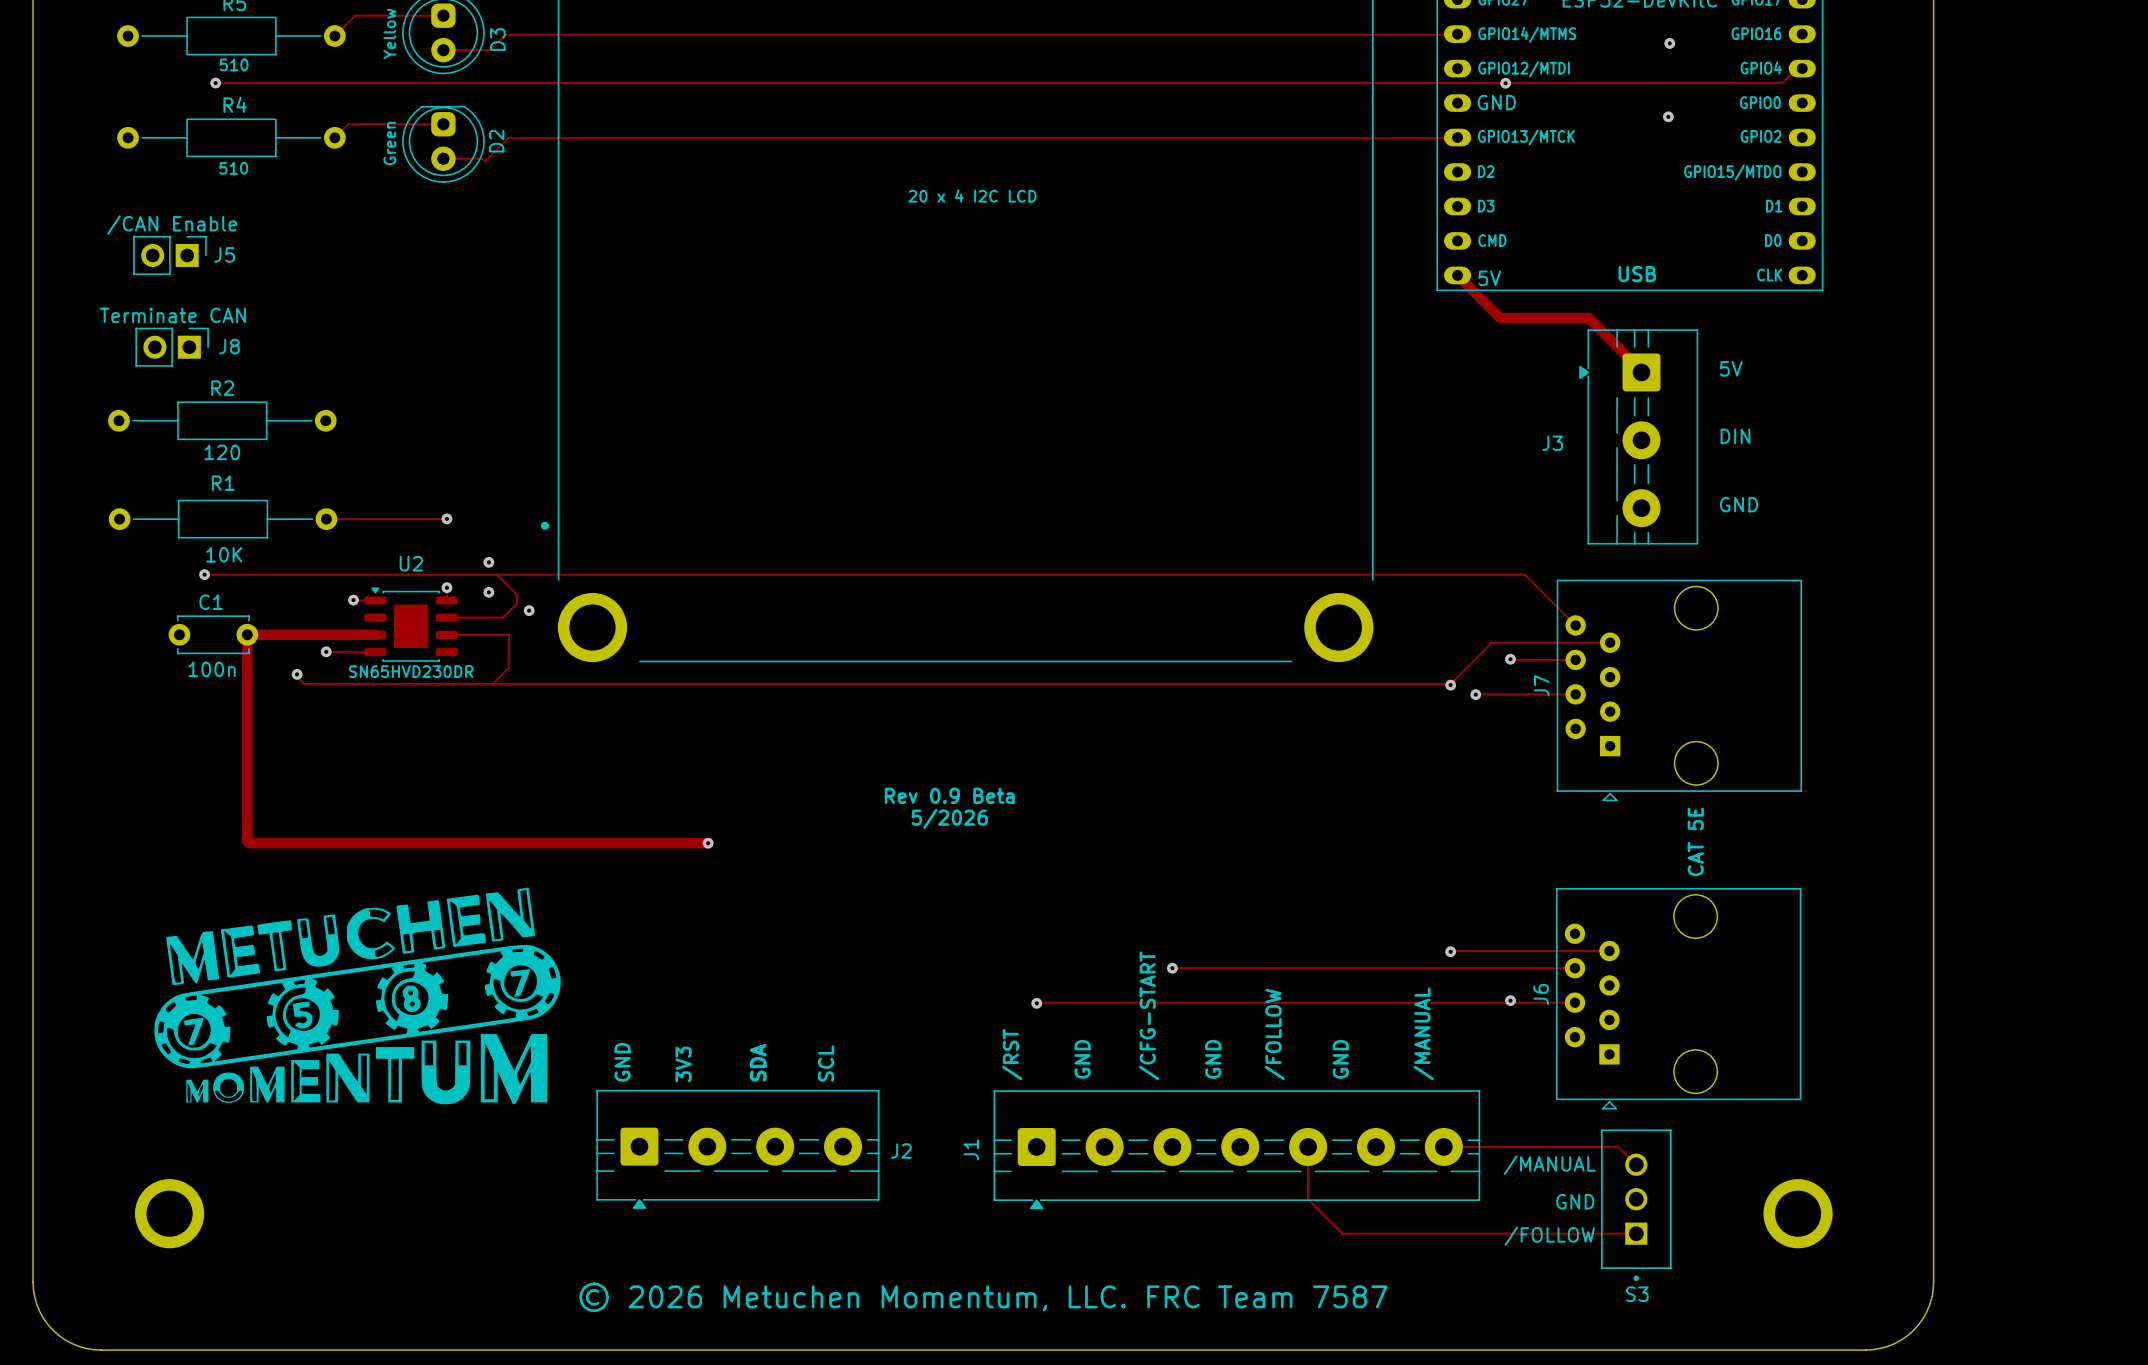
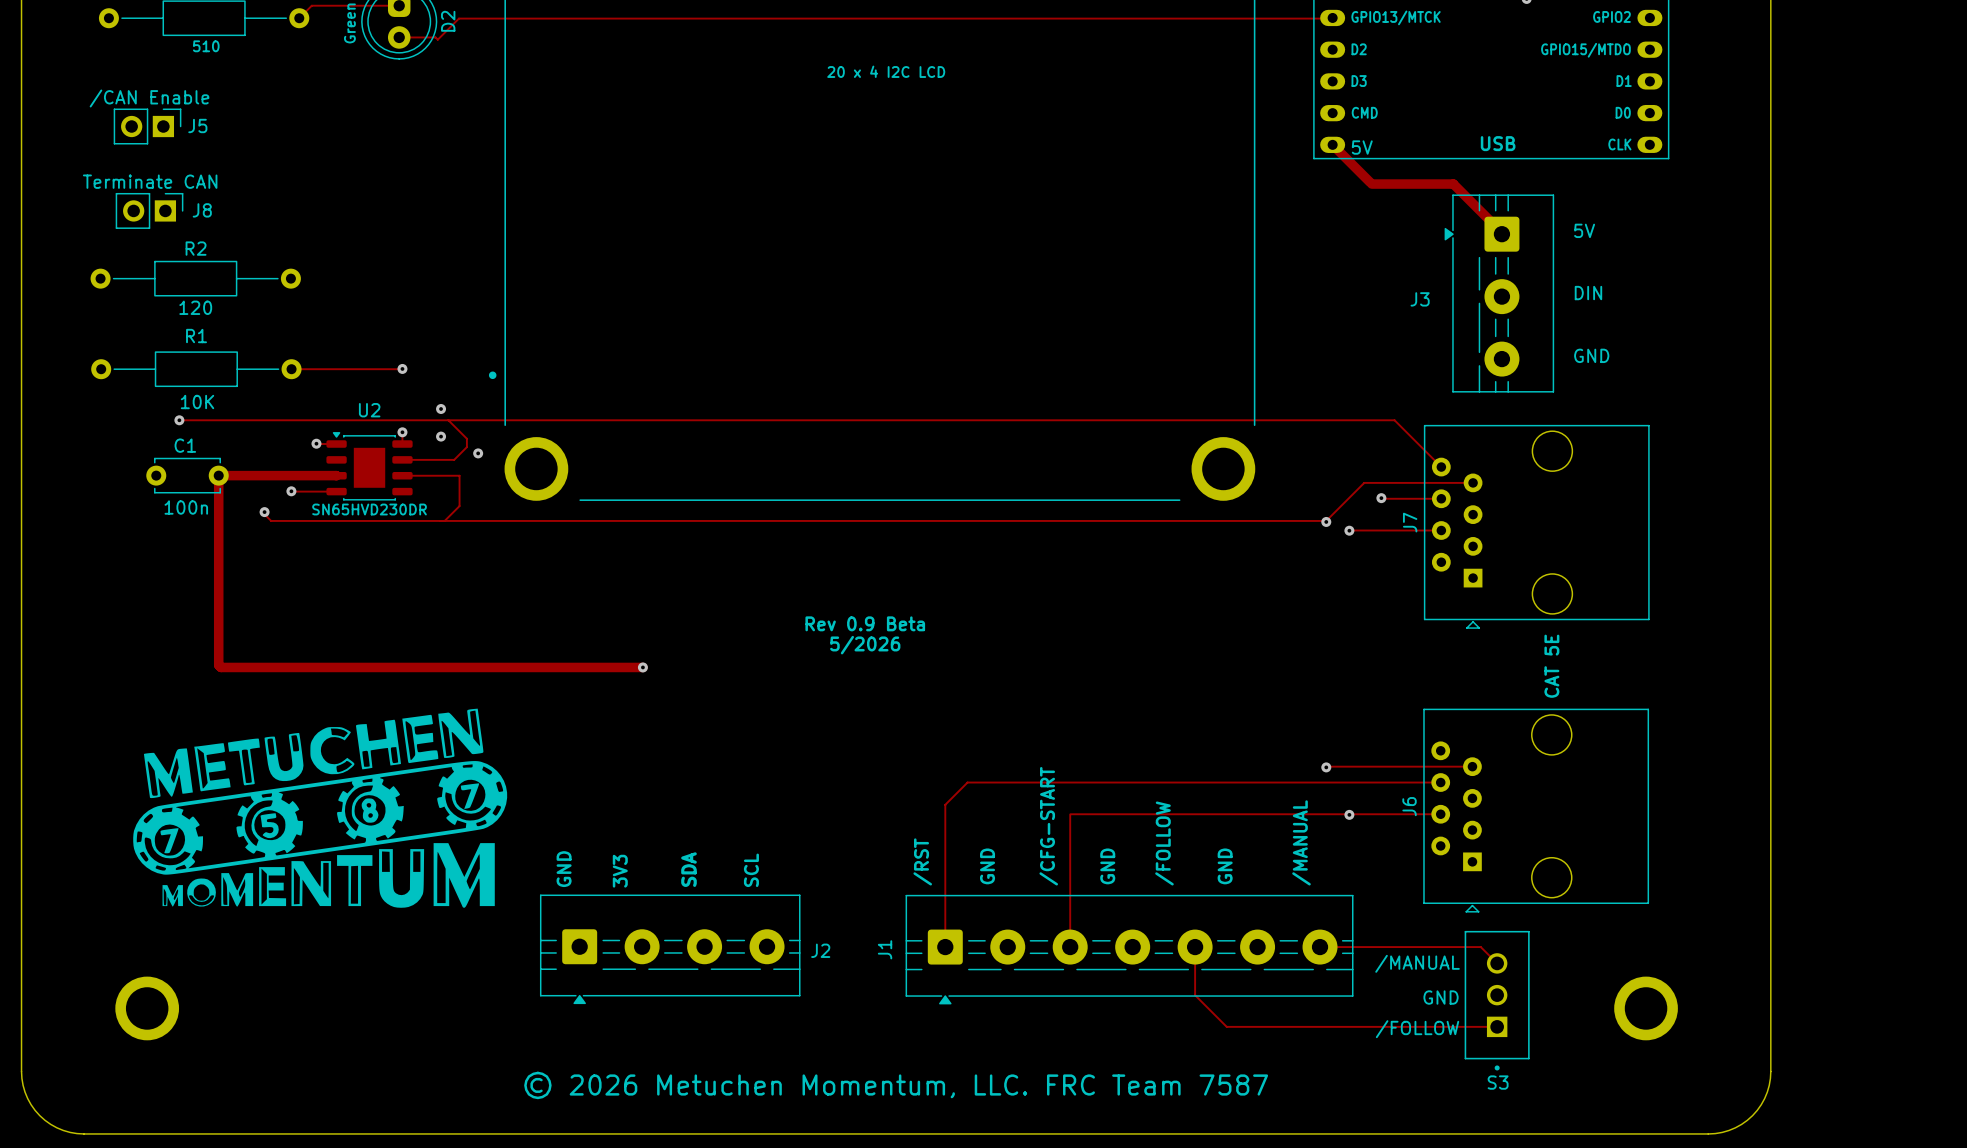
track: none -> (1069, 782) (967, 782) (945, 804)
via: (1172, 968) -> none
track: none -> (945, 805) (945, 947)
via position: (1510, 1000) -> (1349, 814)
track: (1040, 1002) (1173, 1002) -> none
track: none -> (1070, 814) (1070, 947)
via: (1036, 1003) -> none

